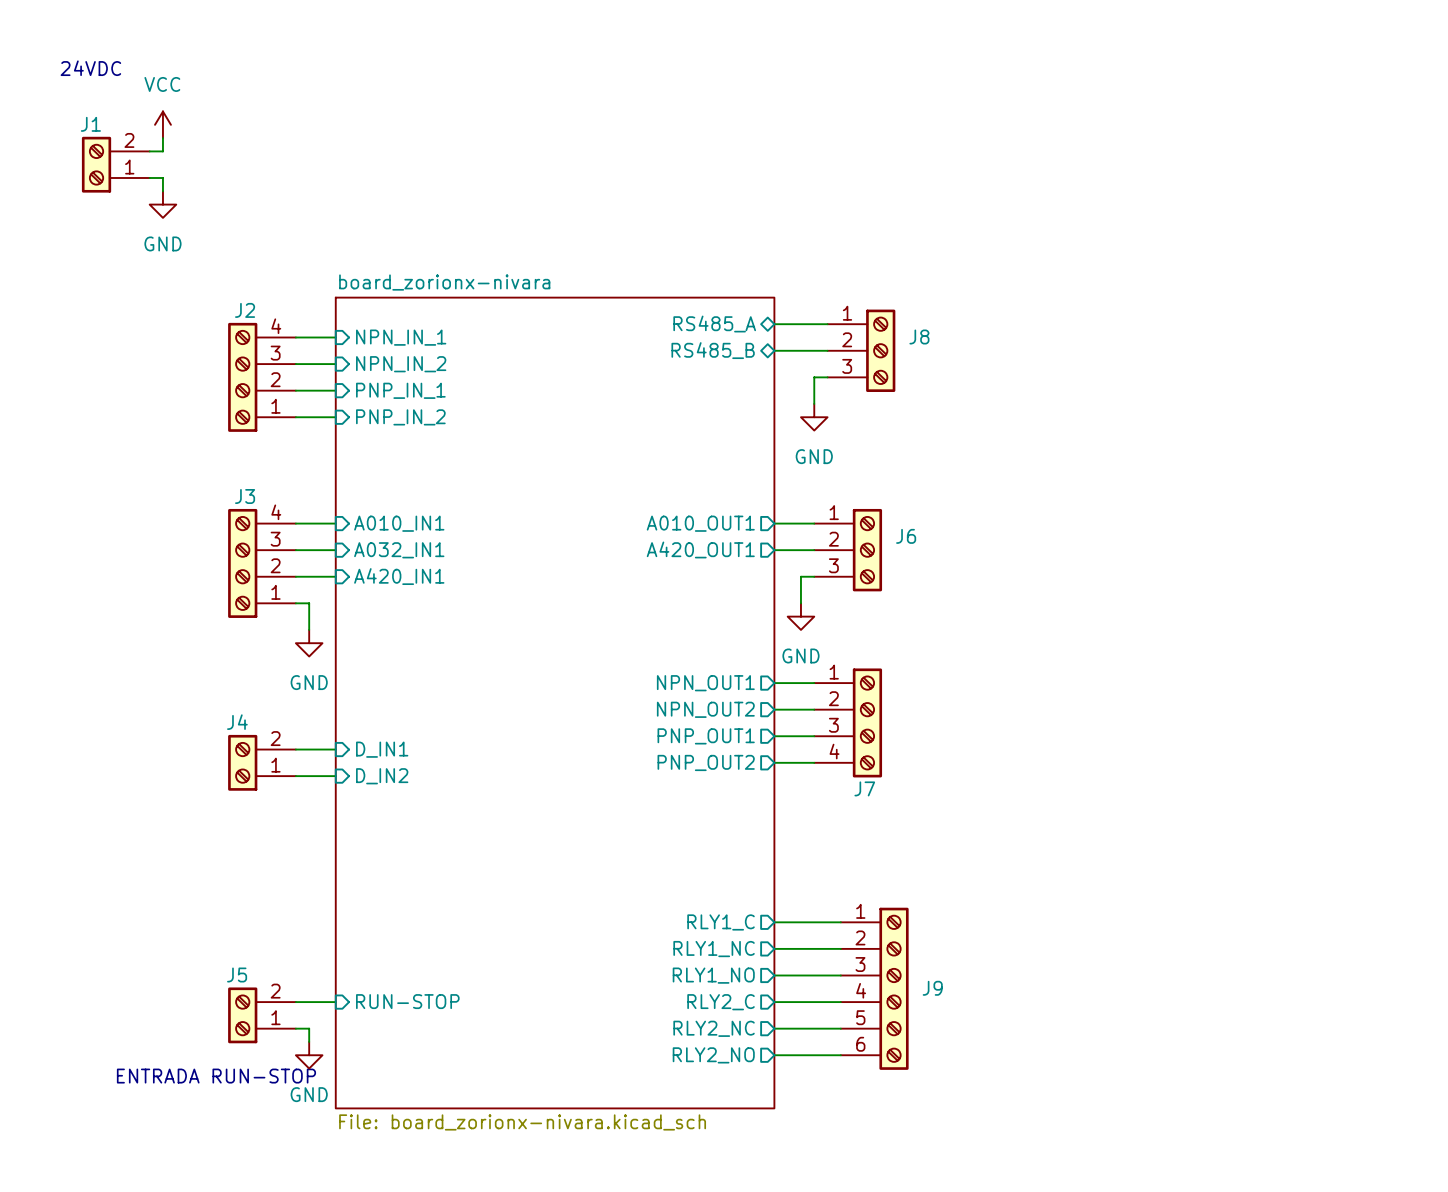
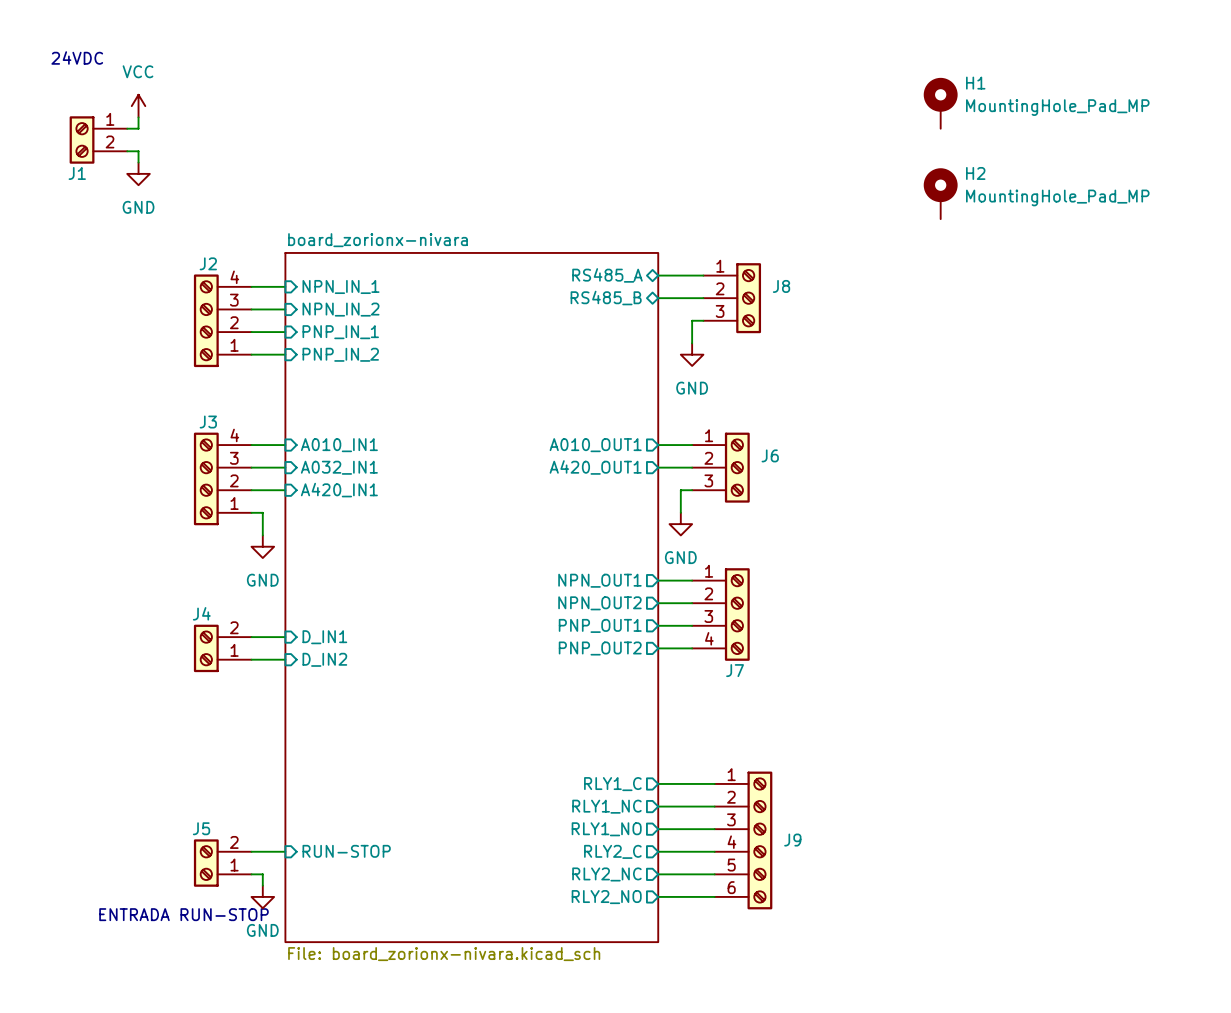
H1: none -> MountingHole_Pad_MP (940, 103)
J1 flip: as is (96, 164) -> up-down (82, 139)
H2: none -> MountingHole_Pad_MP (940, 193)

